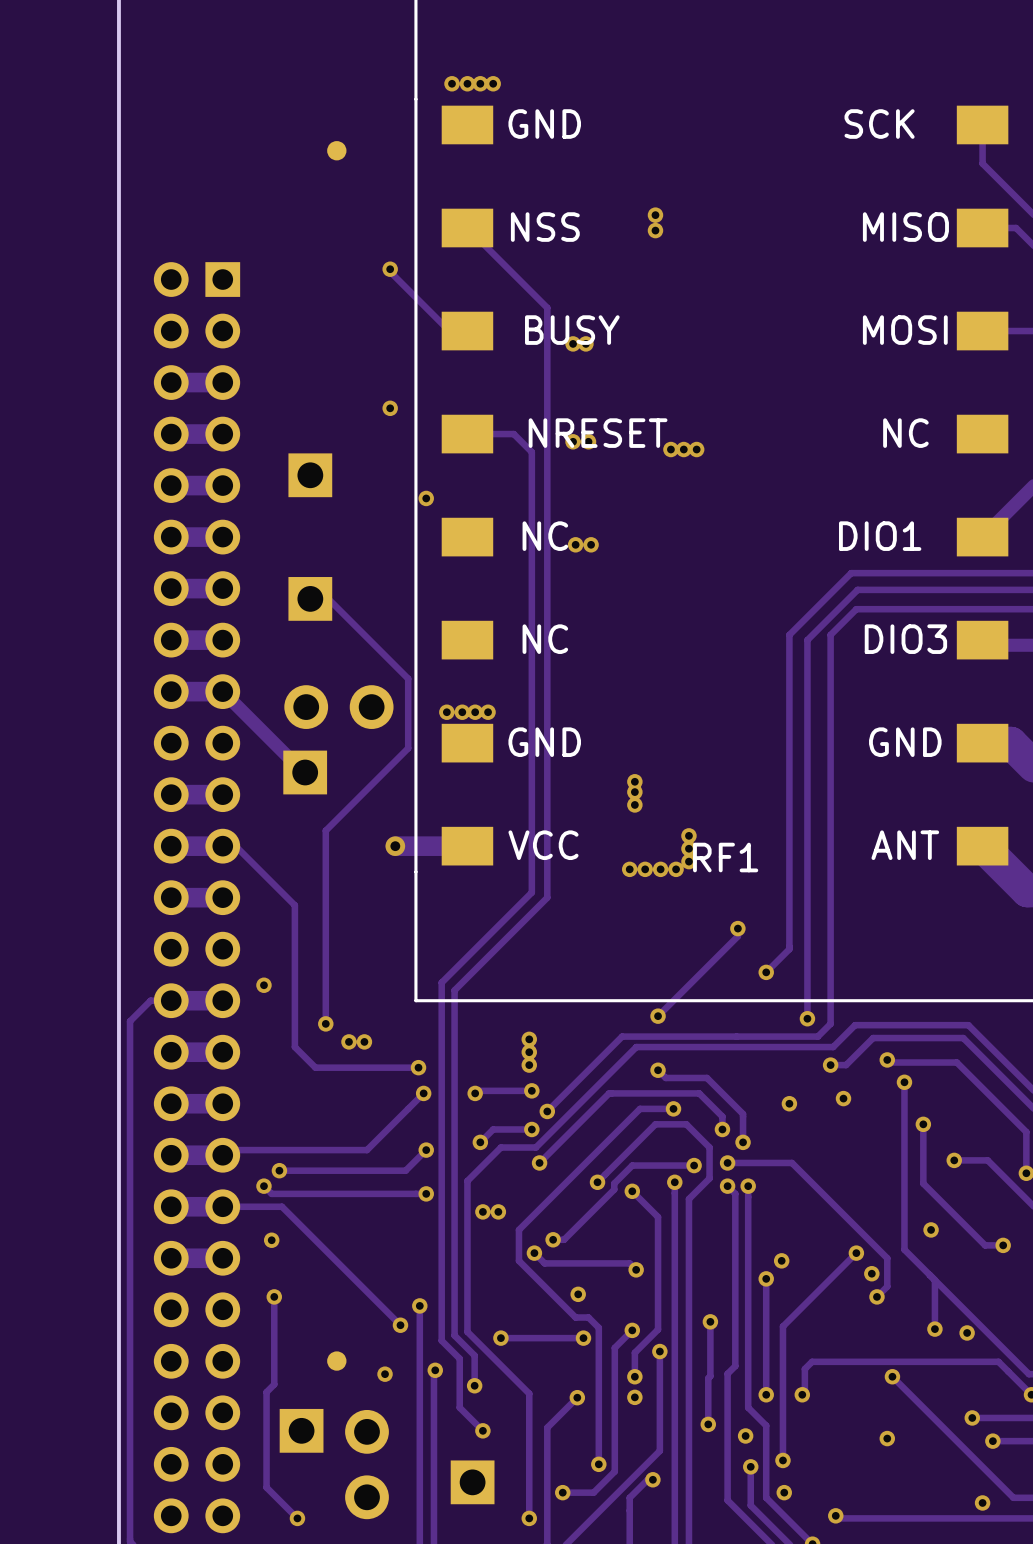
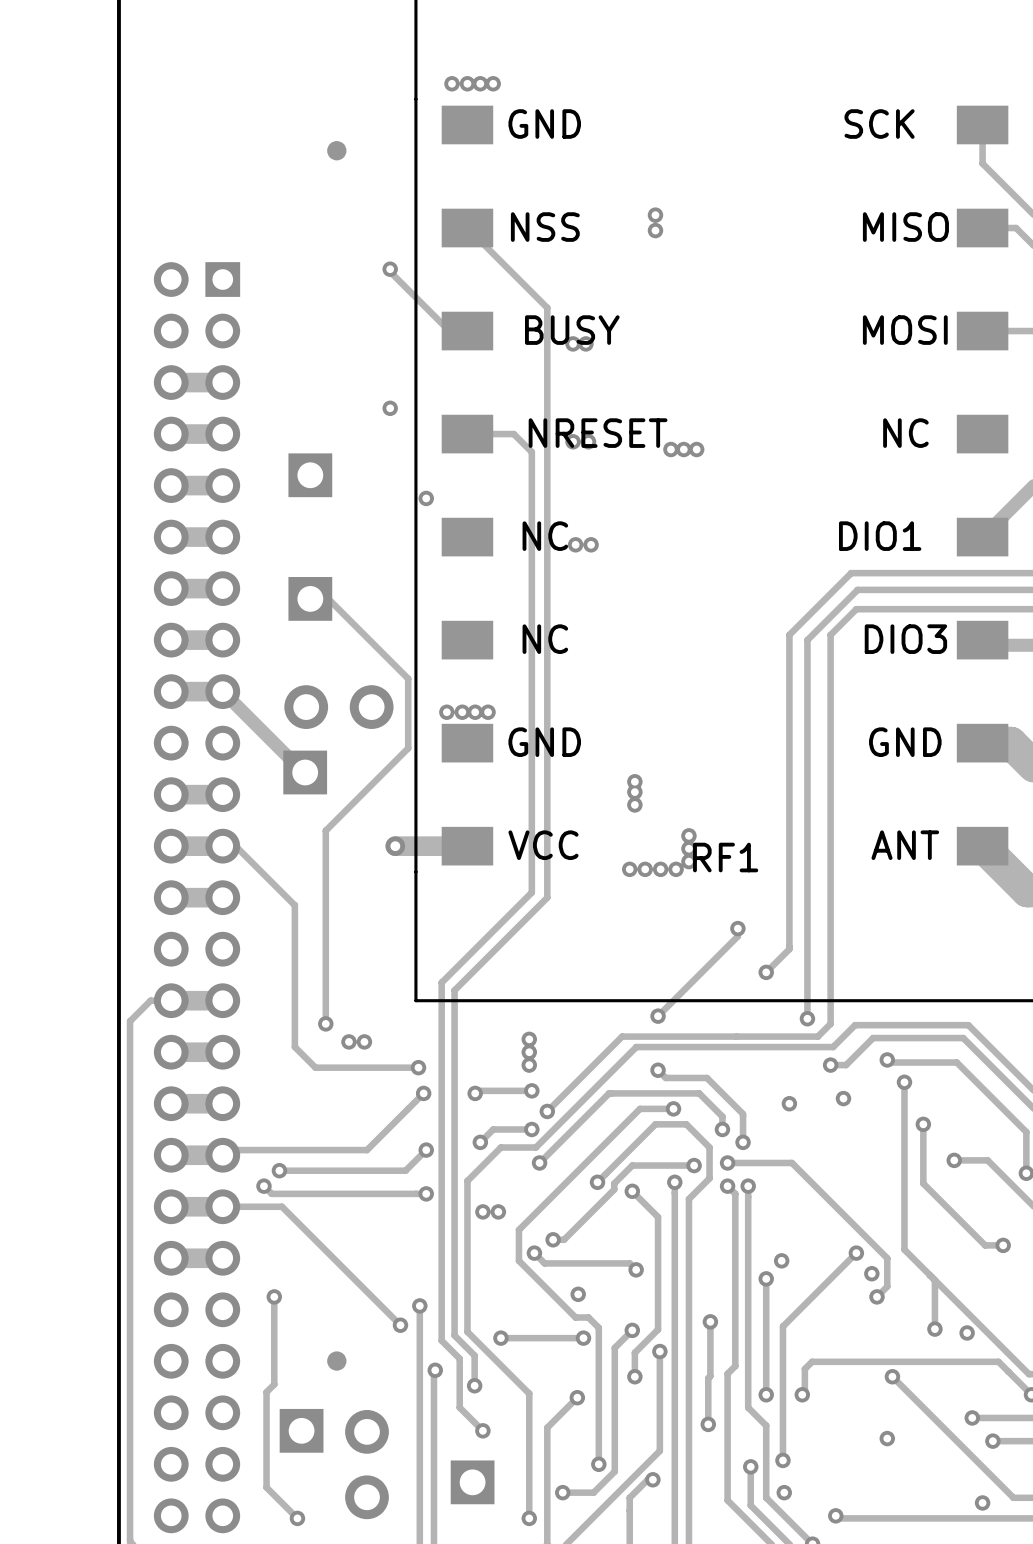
via: (263, 985) -> none
via: (931, 1229) -> none
via: (271, 1240) -> none
via: (385, 1374) -> none
via: (634, 1397) -> none
via: (745, 1435) -> none

